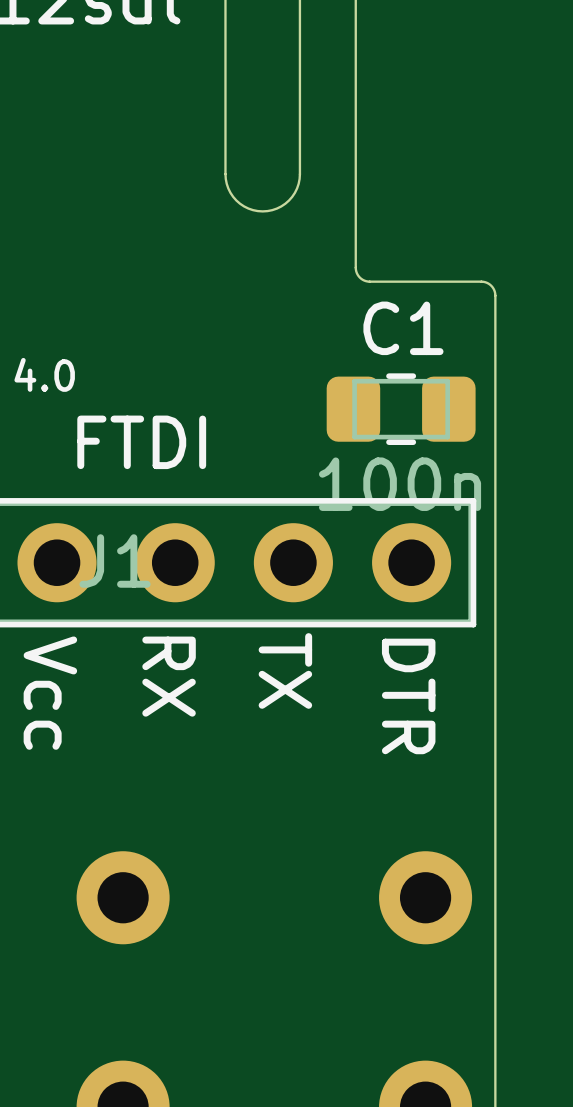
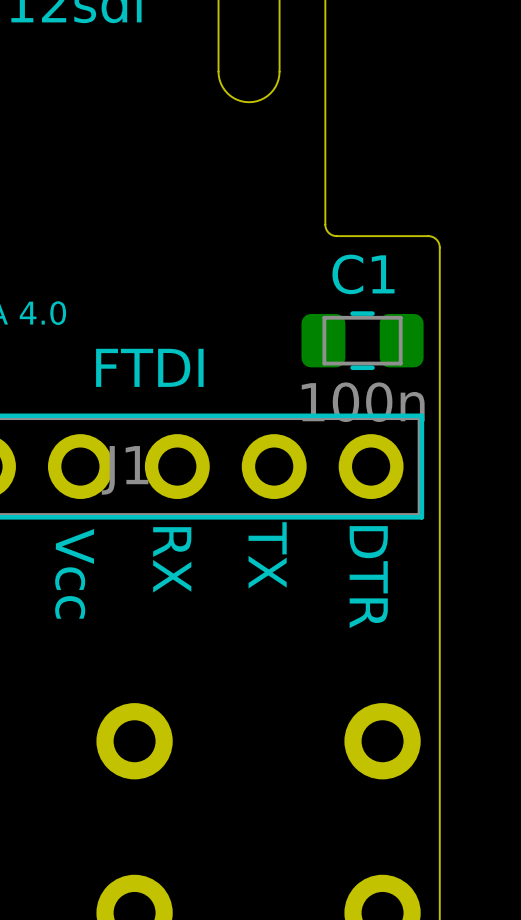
board edge: (299, 81) (298, 183) (294, 192) (285, 203) (276, 208) (262, 211) (248, 208) (240, 203) (230, 192) (226, 183) (225, 81) -> (279, 71) (277, 83) (270, 93) (260, 99) (249, 102) (237, 99) (227, 93) (220, 83) (218, 71)

